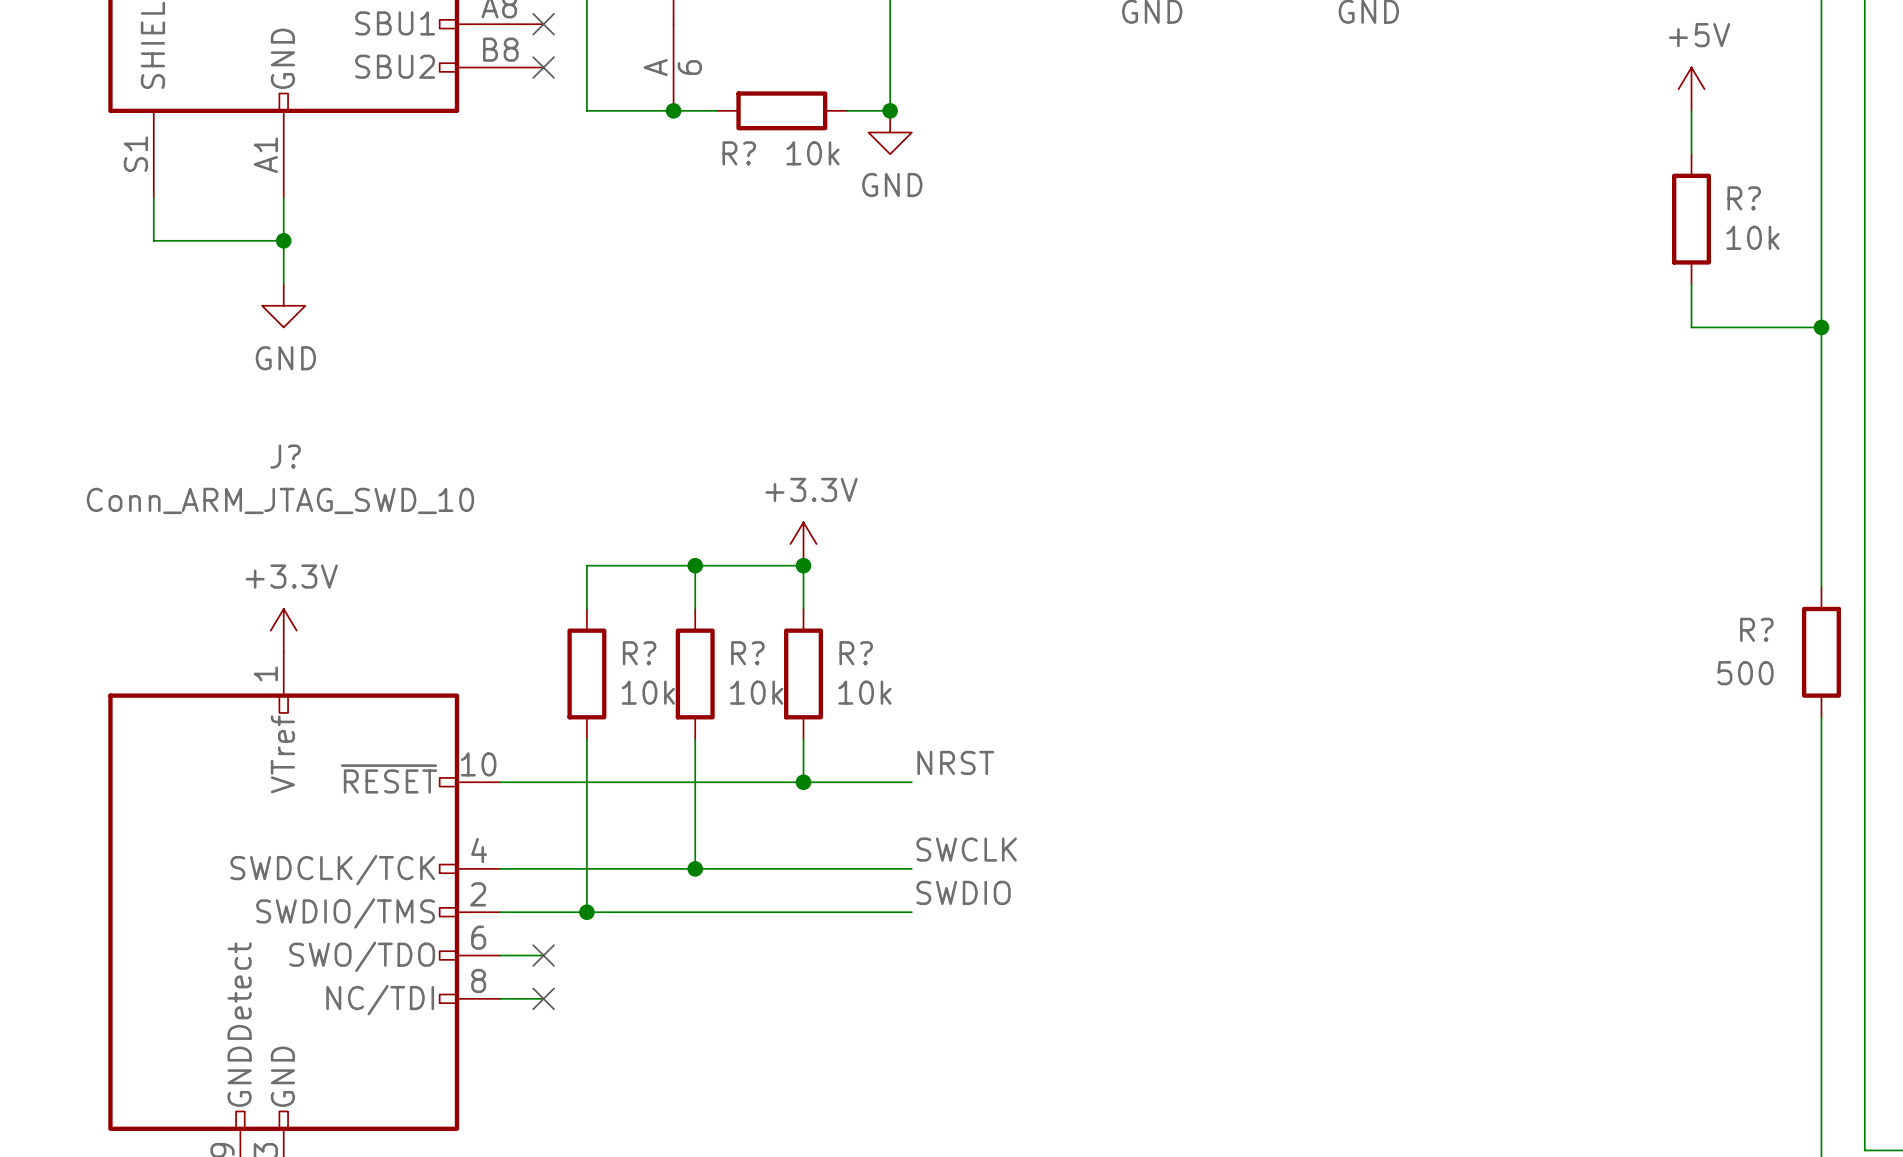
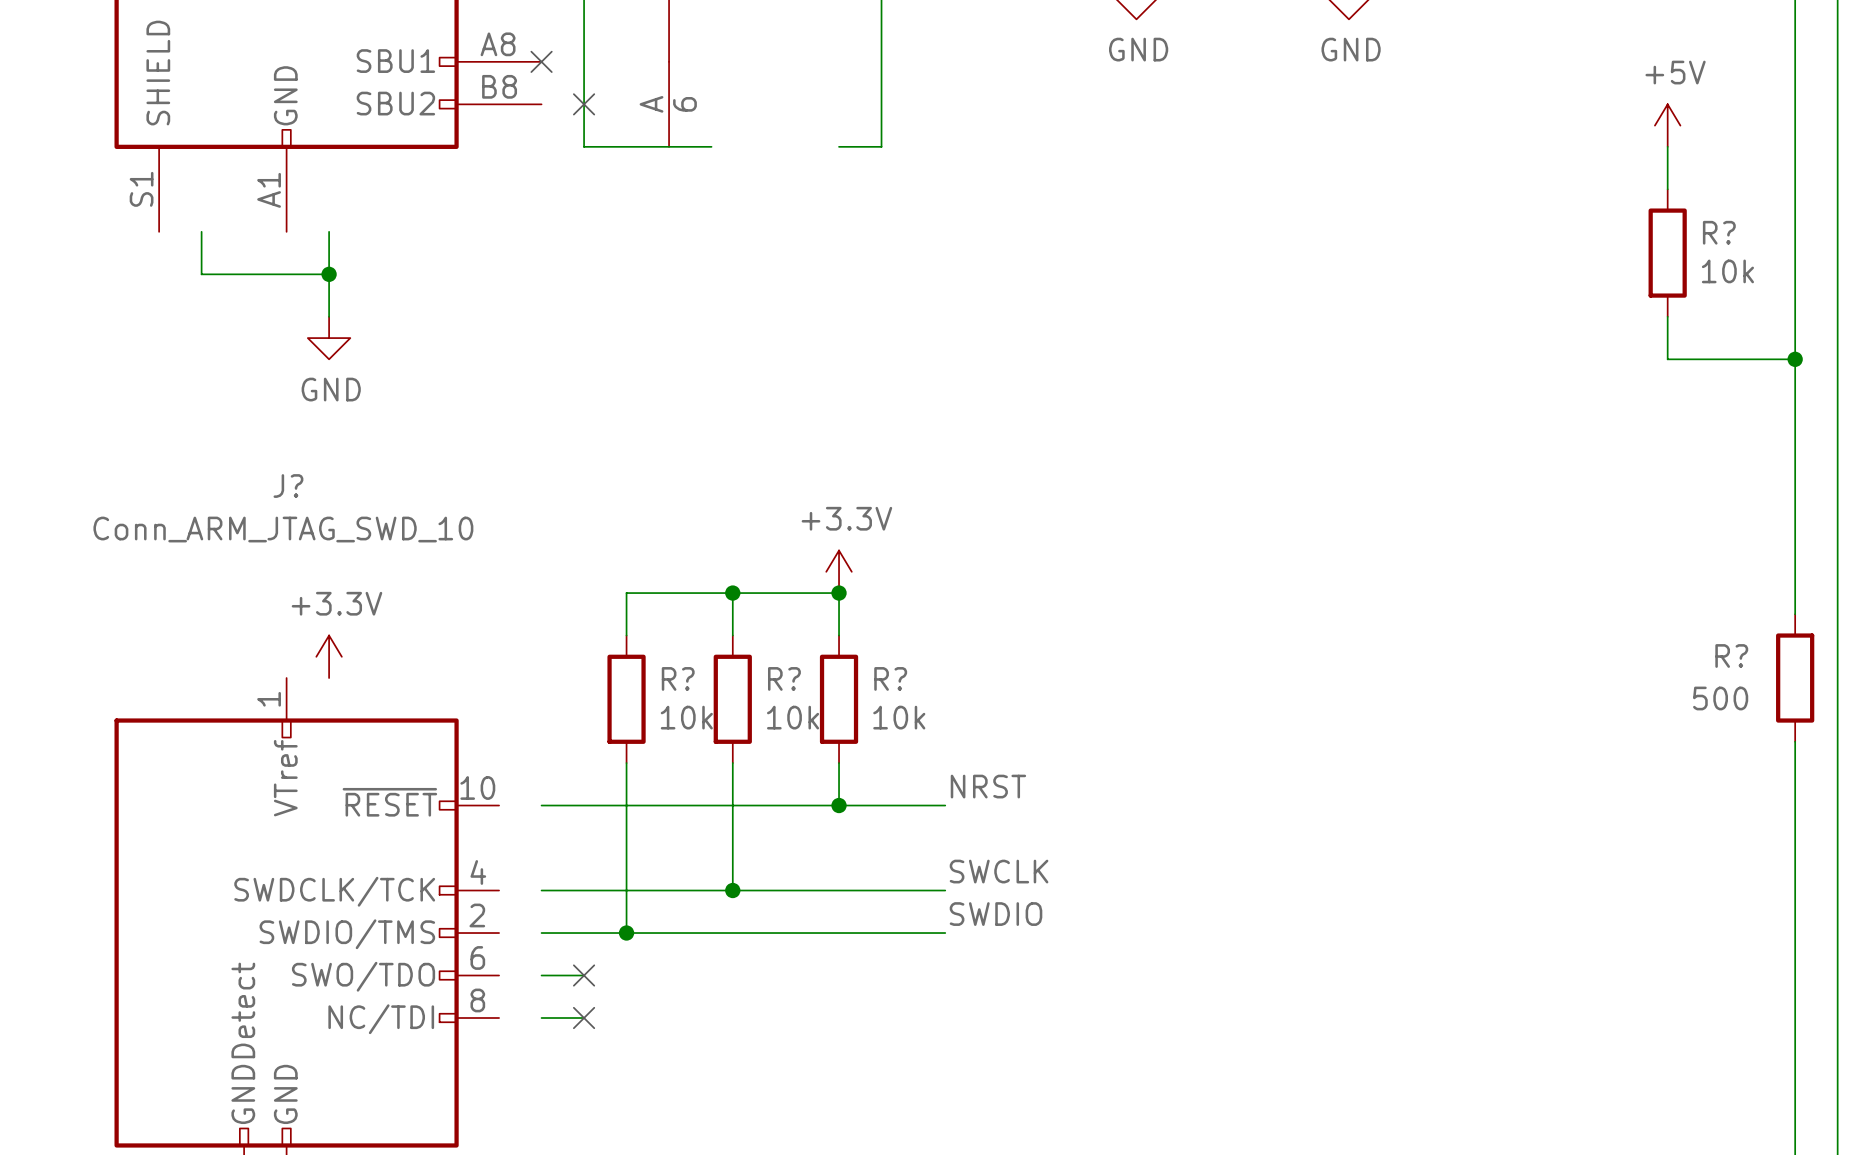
no-connect mark position: (543, 67) -> (584, 104)
junction: (673, 110) -> none
R?: 10k (781, 110) -> none
junction: (890, 110) -> none
power symbol: GND (890, 132) -> none
wire: (153, 197) (153, 240) (197, 240) -> (201, 231) (201, 274)
wire: (283, 197) (283, 284) -> (329, 231) (329, 316)
wire: none -> (286, 274) (329, 274)
junction position: (283, 240) -> (329, 274)
power symbol position: GND (283, 305) -> GND (329, 338)
power symbol position: +3.3V (803, 544) -> +3.3V (839, 571)
wire: (630, 565) (586, 565) (586, 608) -> (626, 593) (626, 635)
wire: (695, 565) (695, 608) -> (732, 593) (732, 635)
junction: (695, 565) -> none
junction: none -> (732, 593)
wire: (803, 565) (803, 608) -> (796, 593) (839, 593) (839, 635)
junction: (803, 565) -> none
junction: none -> (839, 593)
power symbol position: +3.3V (283, 630) -> +3.3V (329, 656)
R?: 10k (586, 673) -> none
R?: none -> 10k (626, 699)
R?: 10k (695, 673) -> none
R?: none -> 10k (732, 699)
R?: 10k (803, 673) -> none
R?: none -> 10k (839, 699)
wire: (586, 738) (586, 912) -> (626, 763) (626, 933)
wire: (695, 738) (695, 868) -> (732, 763) (732, 890)
wire: (803, 738) (803, 782) -> (839, 763) (839, 805)
label position: NRST (955, 762) -> NRST (988, 786)
wire: (500, 782) (543, 782) -> (902, 805) (945, 805)
junction position: (803, 782) -> (839, 805)
label position: SWCLK (966, 849) -> SWCLK (999, 871)
wire: (500, 868) (543, 868) -> (902, 890) (945, 890)
junction: (695, 868) -> none
junction: none -> (732, 890)
label position: SWDIO (963, 892) -> SWDIO (996, 914)
wire: (500, 912) (543, 912) -> (902, 933) (945, 933)
junction: (586, 912) -> none
junction: none -> (626, 933)
wire: (500, 955) (543, 955) -> (584, 975) (541, 975)
no-connect mark: (543, 955) -> none
no-connect mark: none -> (584, 975)
wire: (500, 998) (543, 998) -> (584, 1018) (541, 1018)
no-connect mark: (543, 998) -> none
no-connect mark: none -> (584, 1018)

